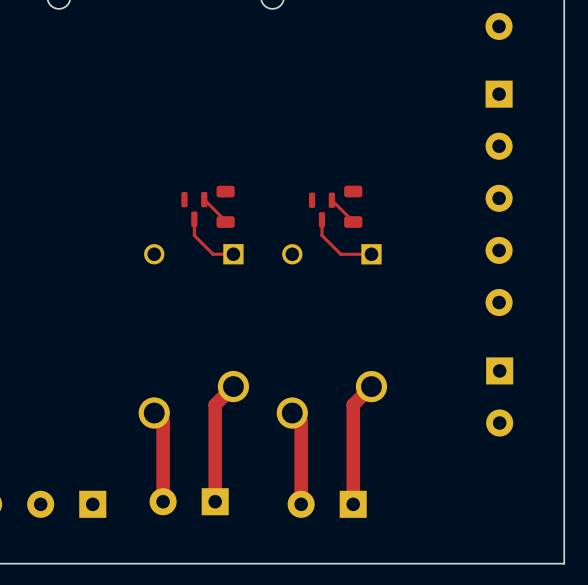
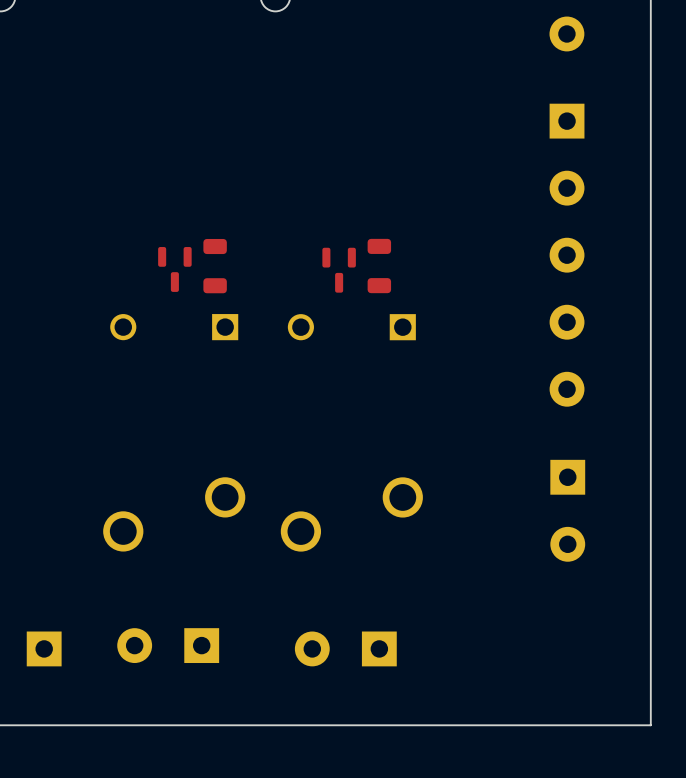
top track: (204, 199) (225, 222) -> none
top track: (331, 200) (353, 221) -> none
top track: (194, 219) (194, 235) (213, 254) (233, 254) -> none
top track: (321, 219) (321, 235) (340, 254) (371, 254) -> none
top track: (233, 386) (215, 404) (215, 501) -> none
top track: (371, 386) (353, 404) (353, 504) -> none
top track: (154, 413) (163, 421) (163, 501) -> none
top track: (292, 413) (301, 421) (301, 504) -> none

